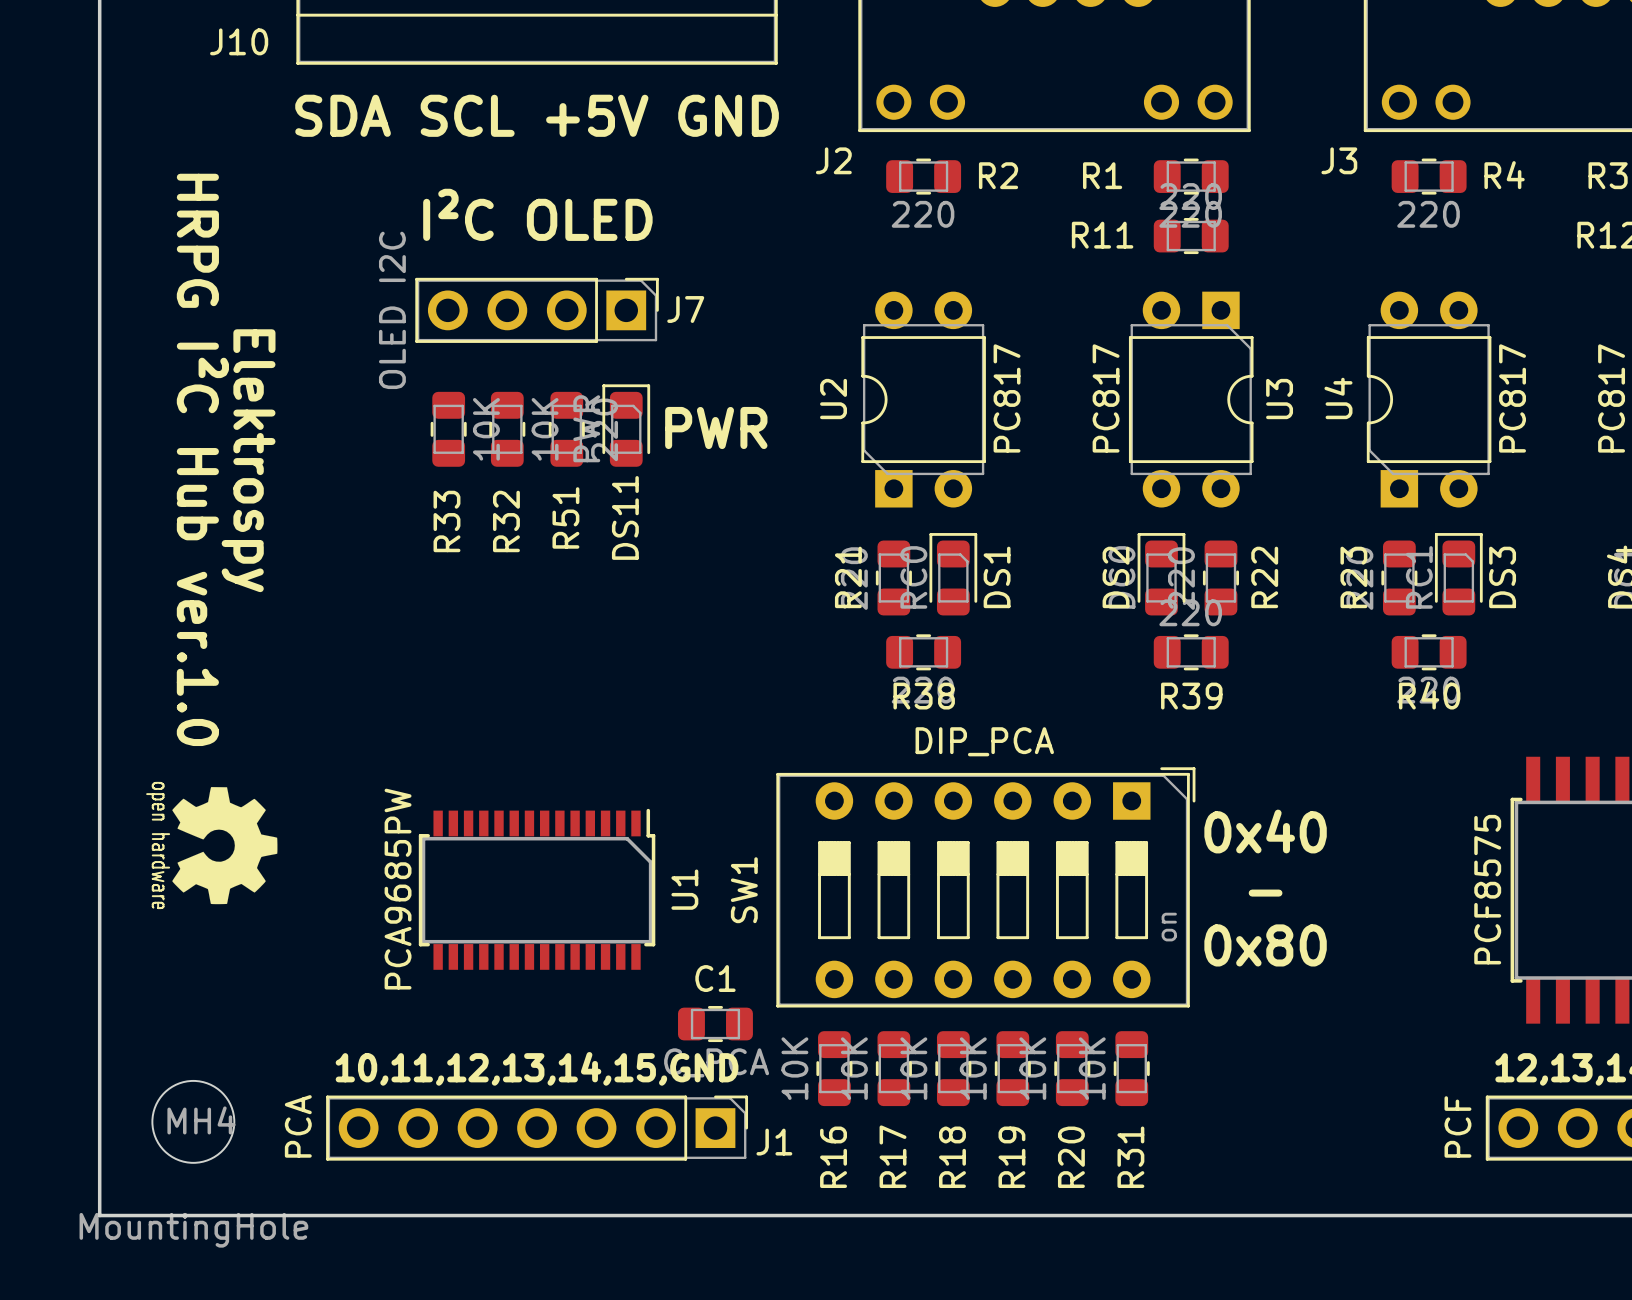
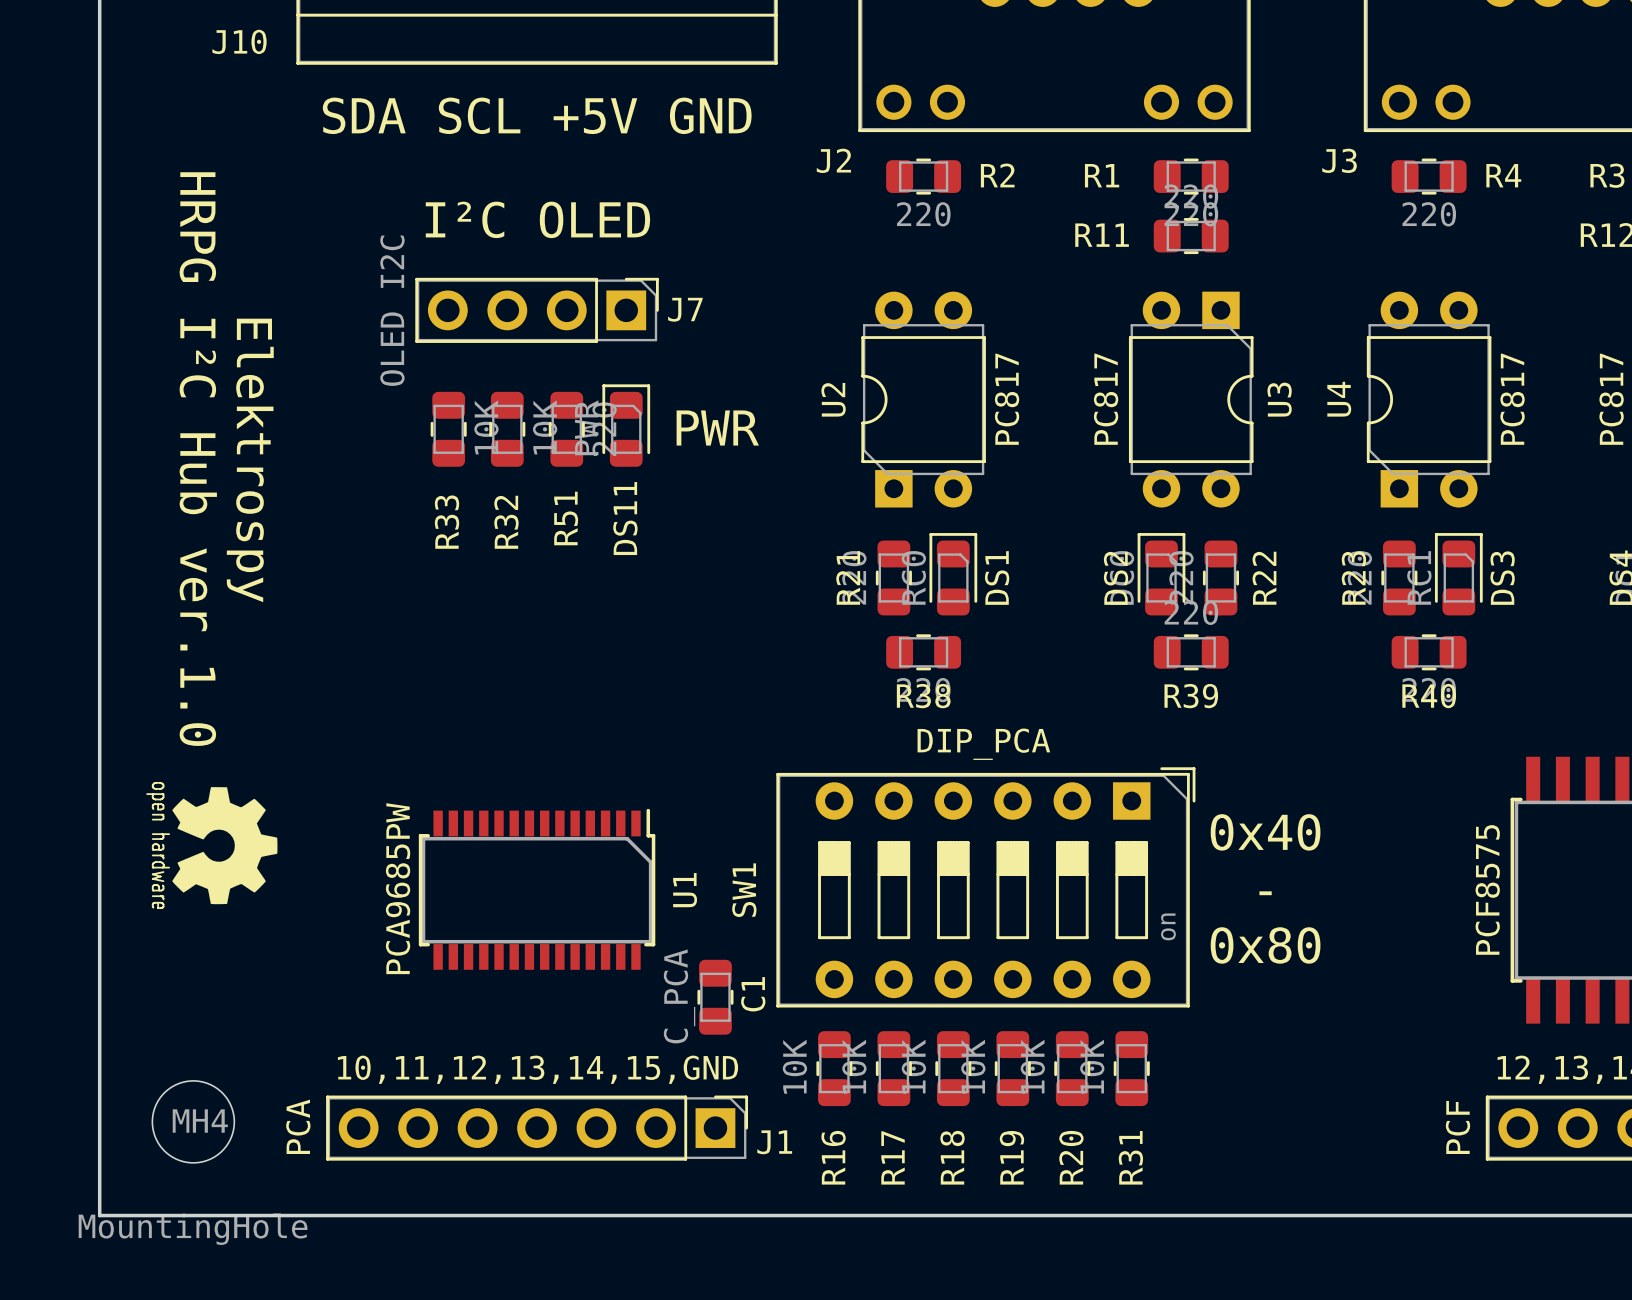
C1 rotation: 0° (715, 1024) -> 90° clockwise (715, 997)

